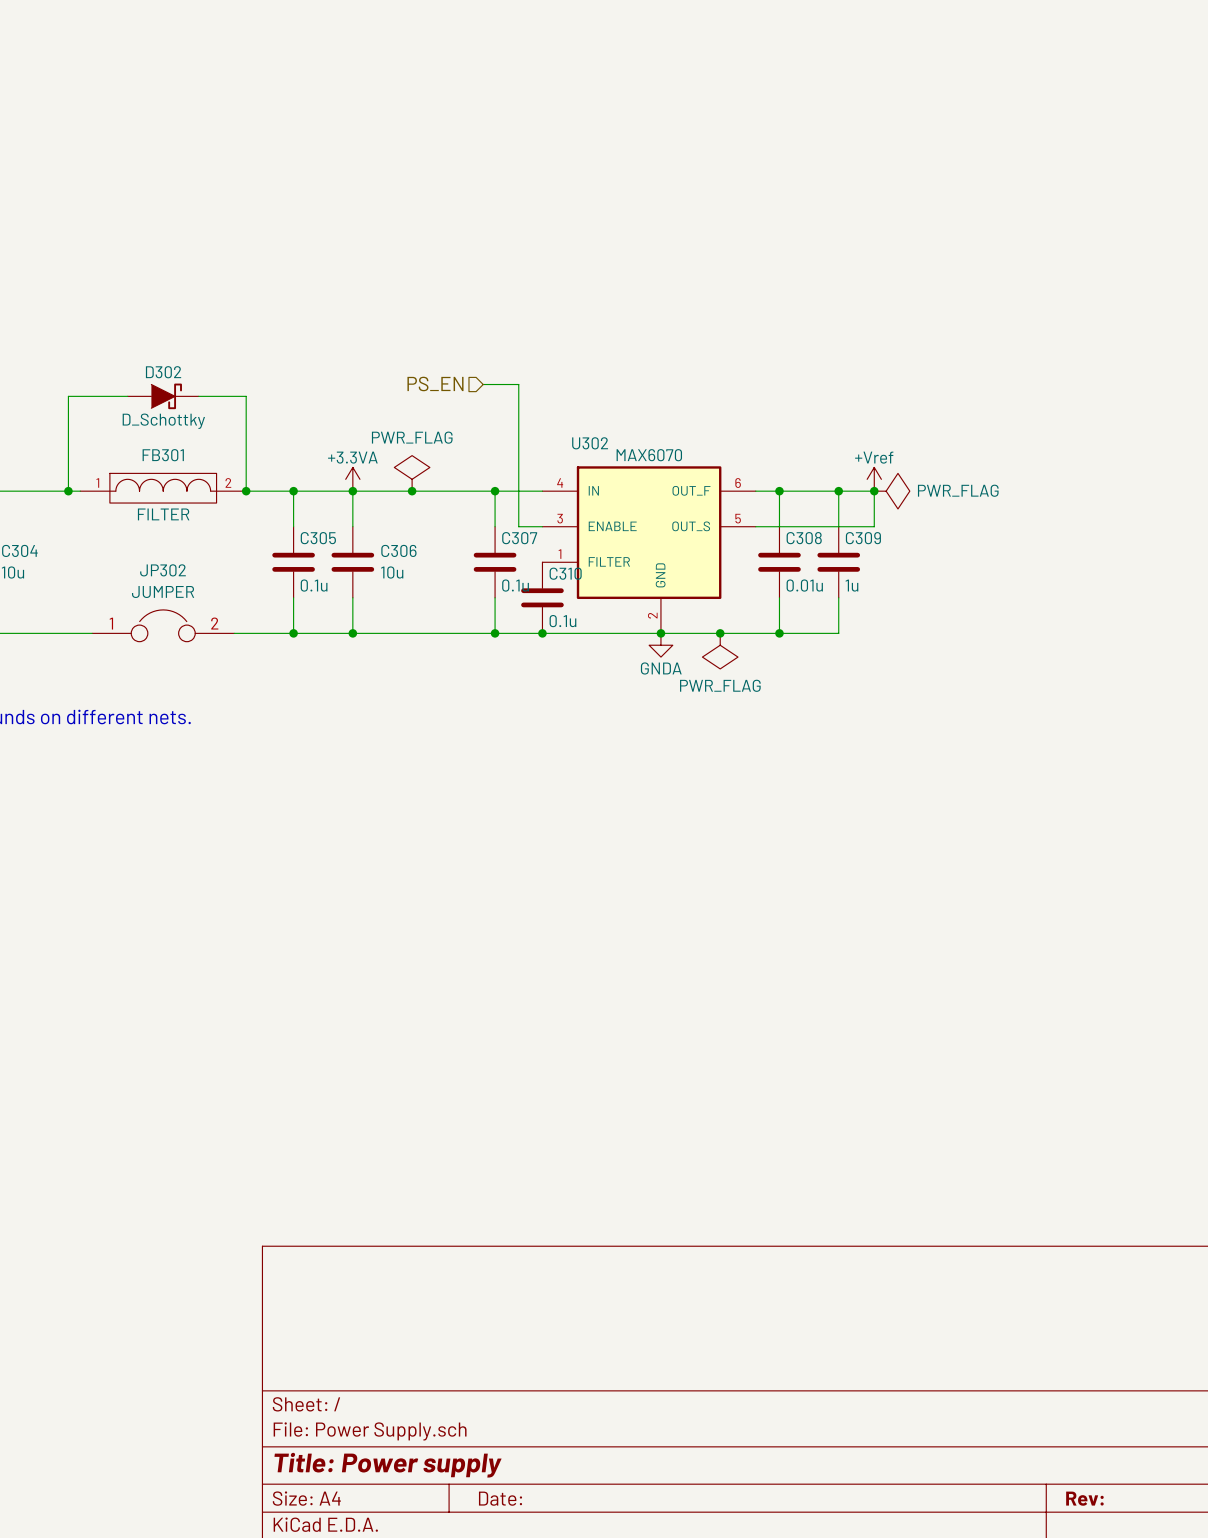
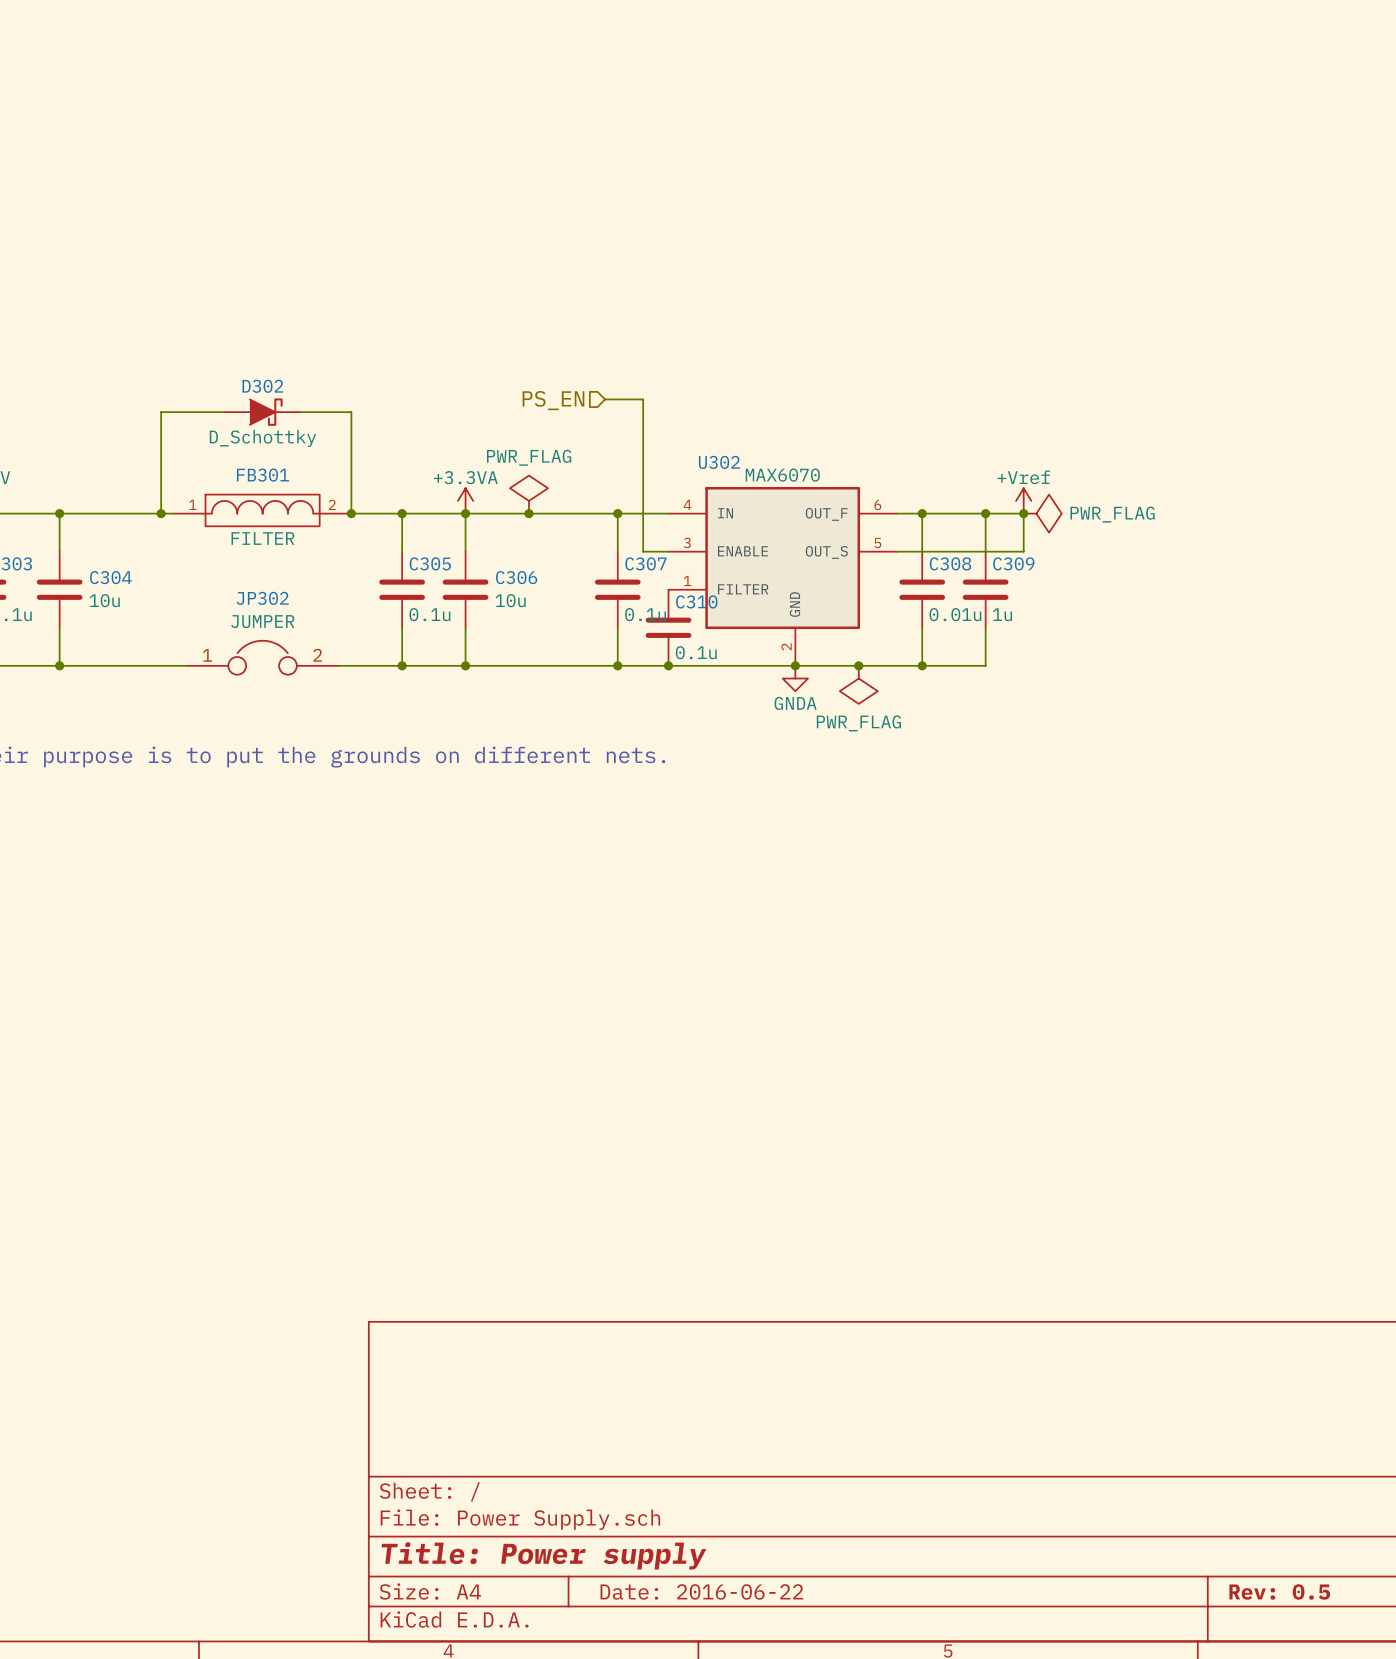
title block: Date: (500, 1498) -> Date: 2016-06-22 (701, 1591)
title block: Rev: (1084, 1498) -> Rev: 0.5 (1279, 1591)

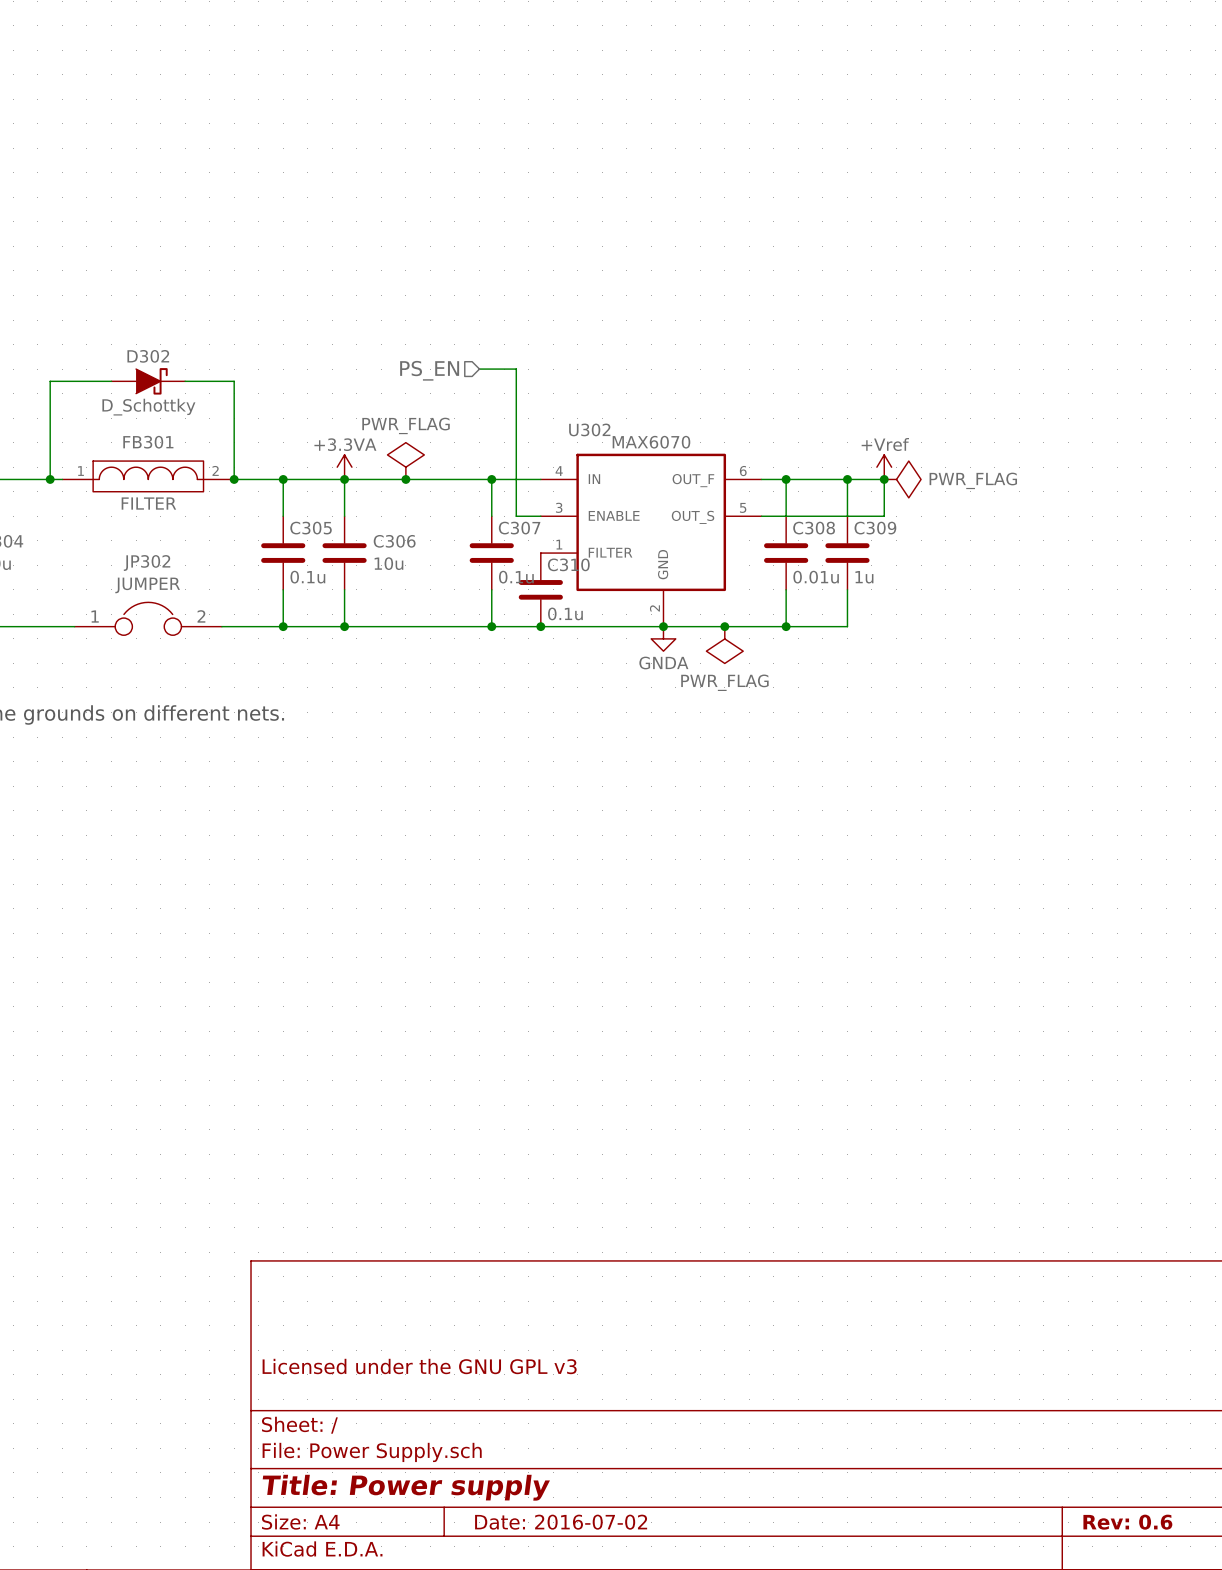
title block: none -> Licensed under the GNU GPL v3 (419, 1366)
title block: Date: 2016-06-22 (701, 1591) -> Date: 2016-07-02 (561, 1522)
title block: Rev: 0.5 (1279, 1591) -> Rev: 0.6 (1127, 1522)

